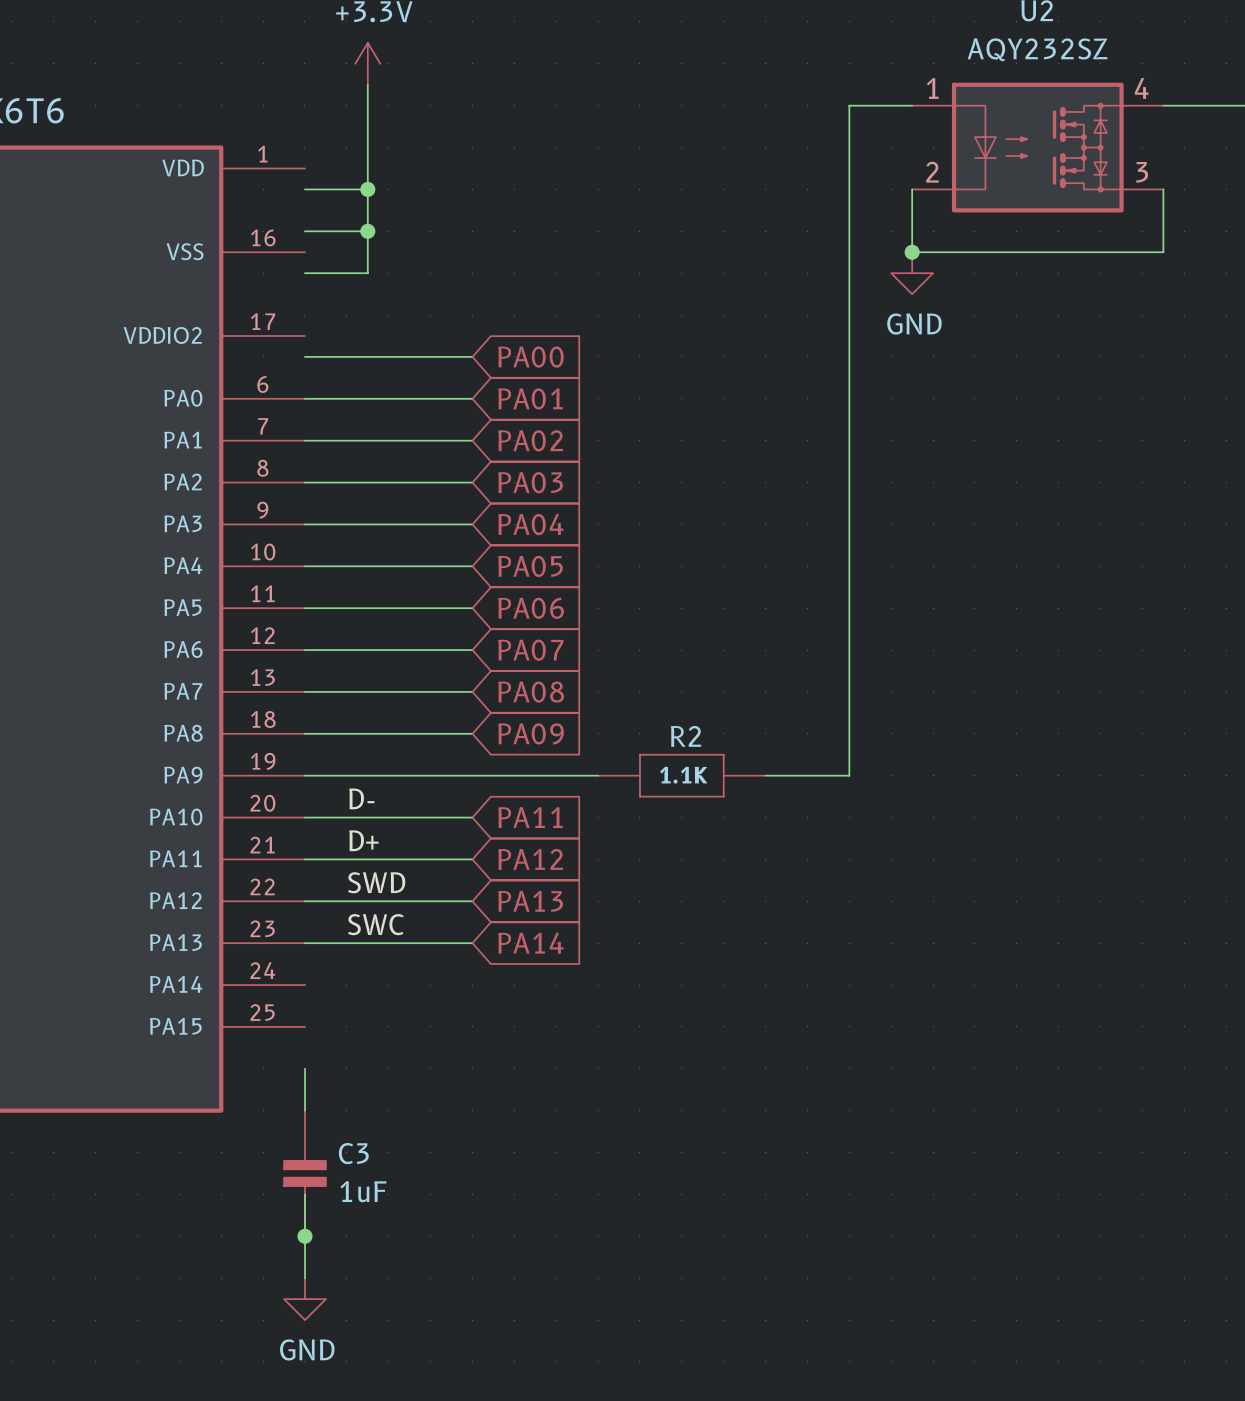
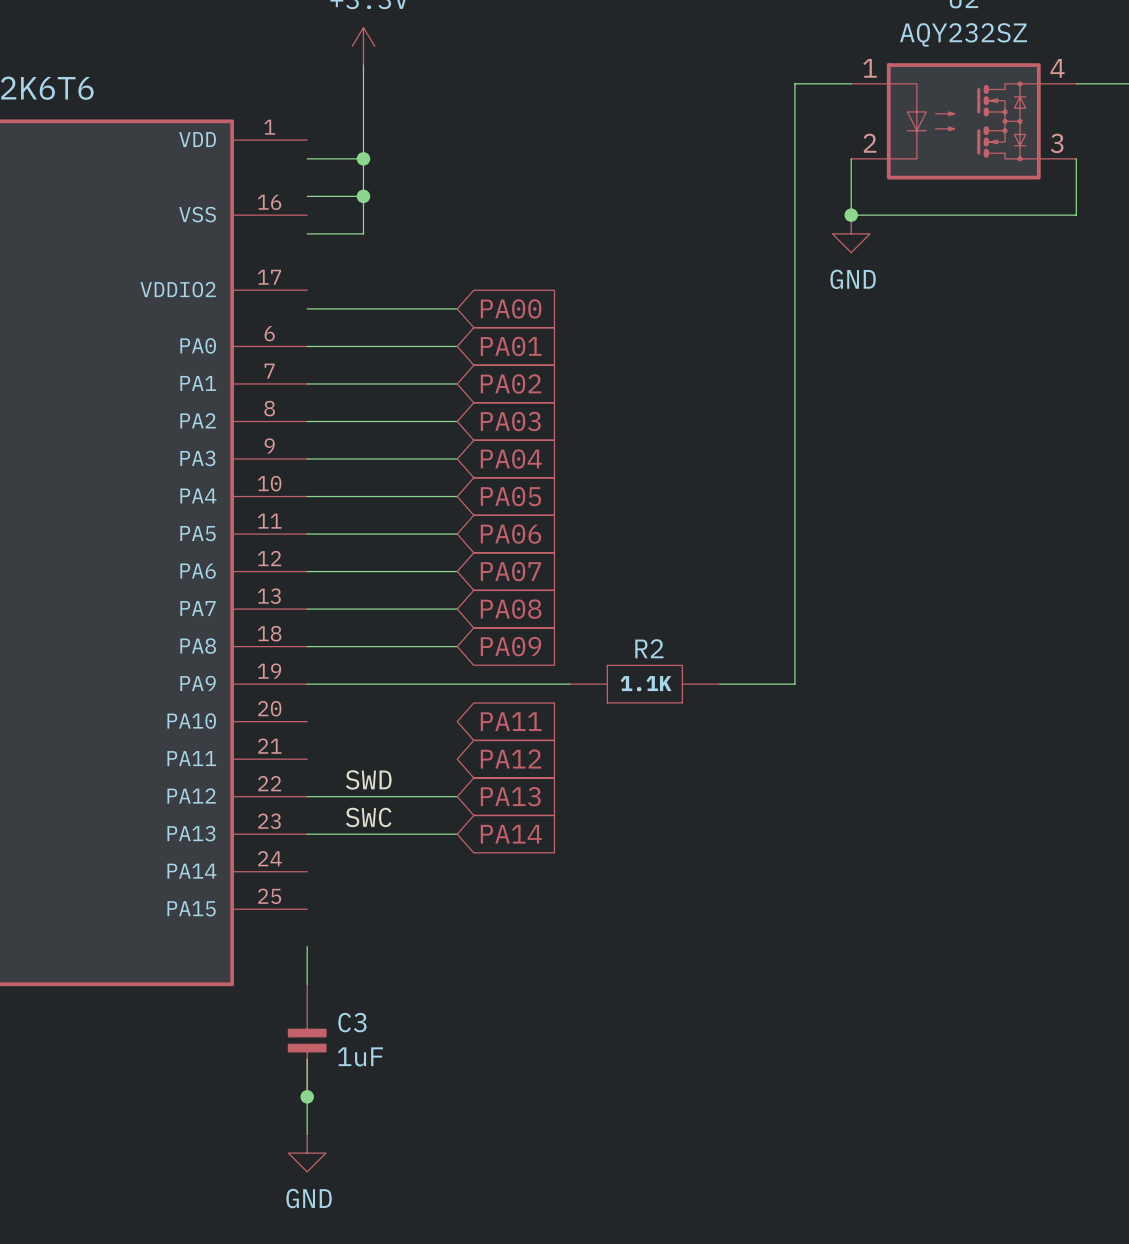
label: D- (361, 798) -> none
wire: (304, 817) (472, 817) -> none
label: D+ (363, 840) -> none
wire: (304, 859) (472, 859) -> none

